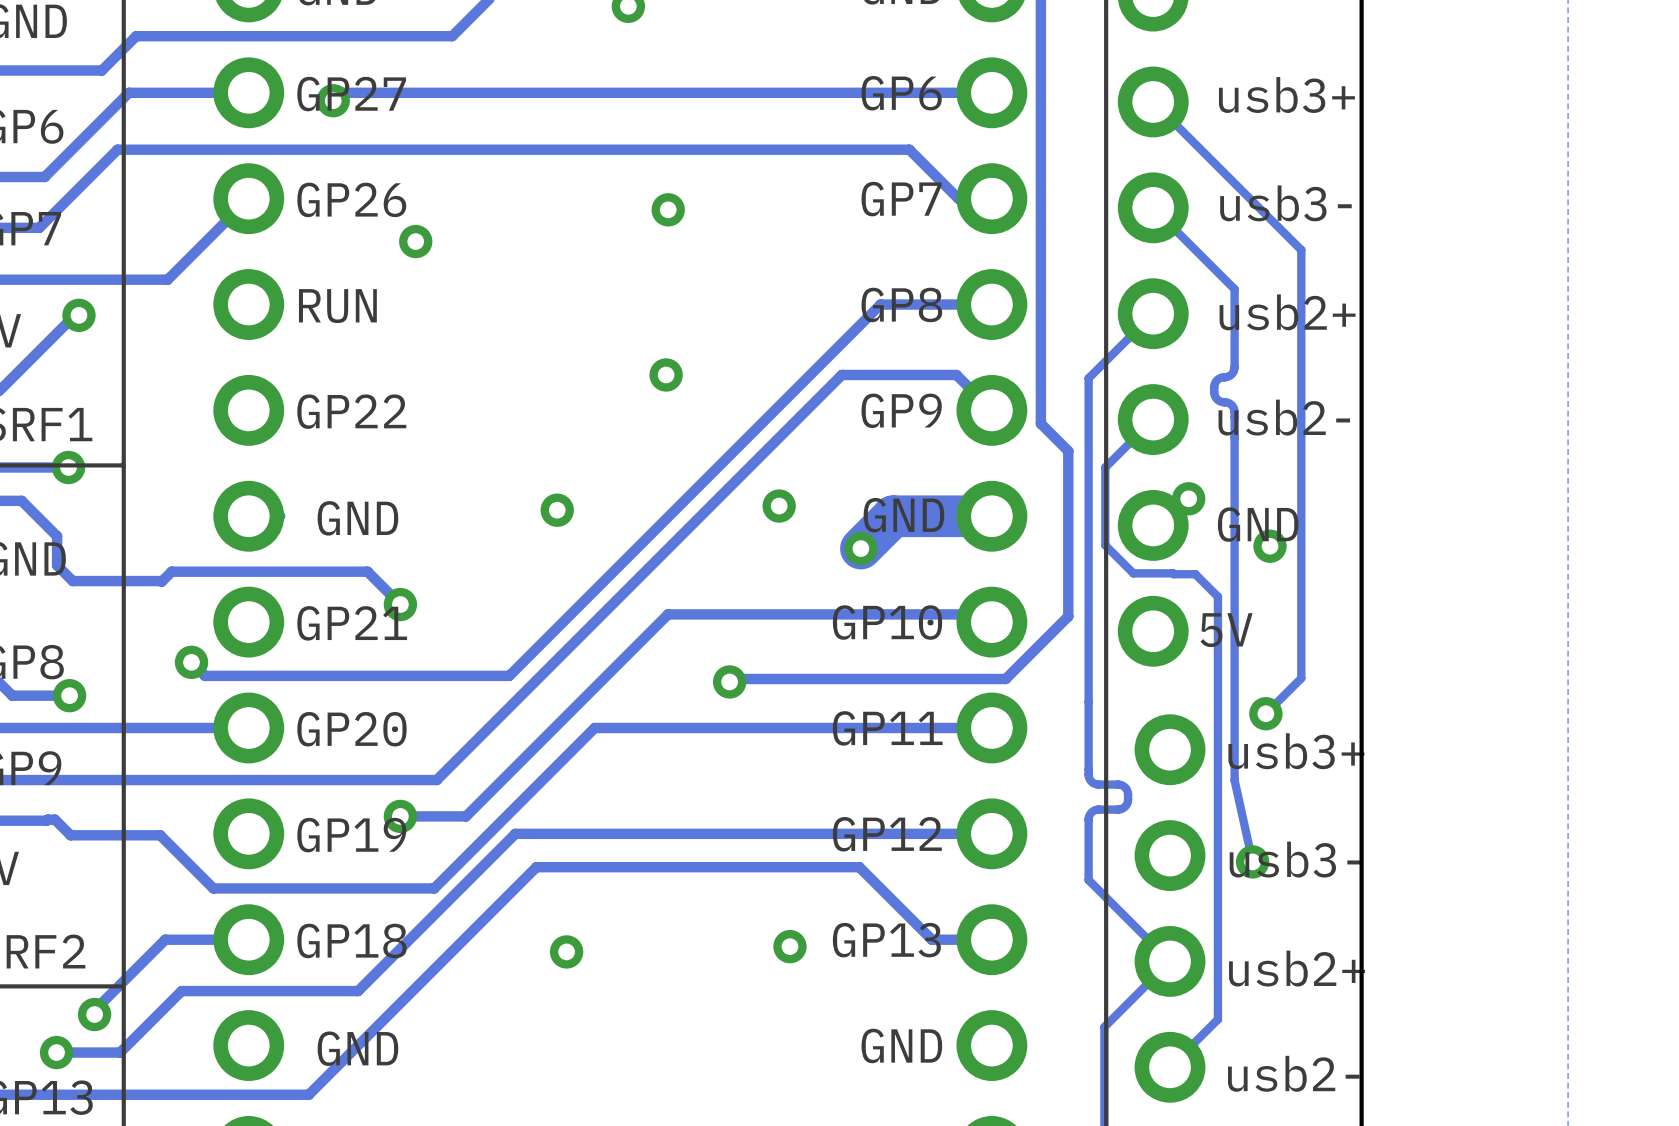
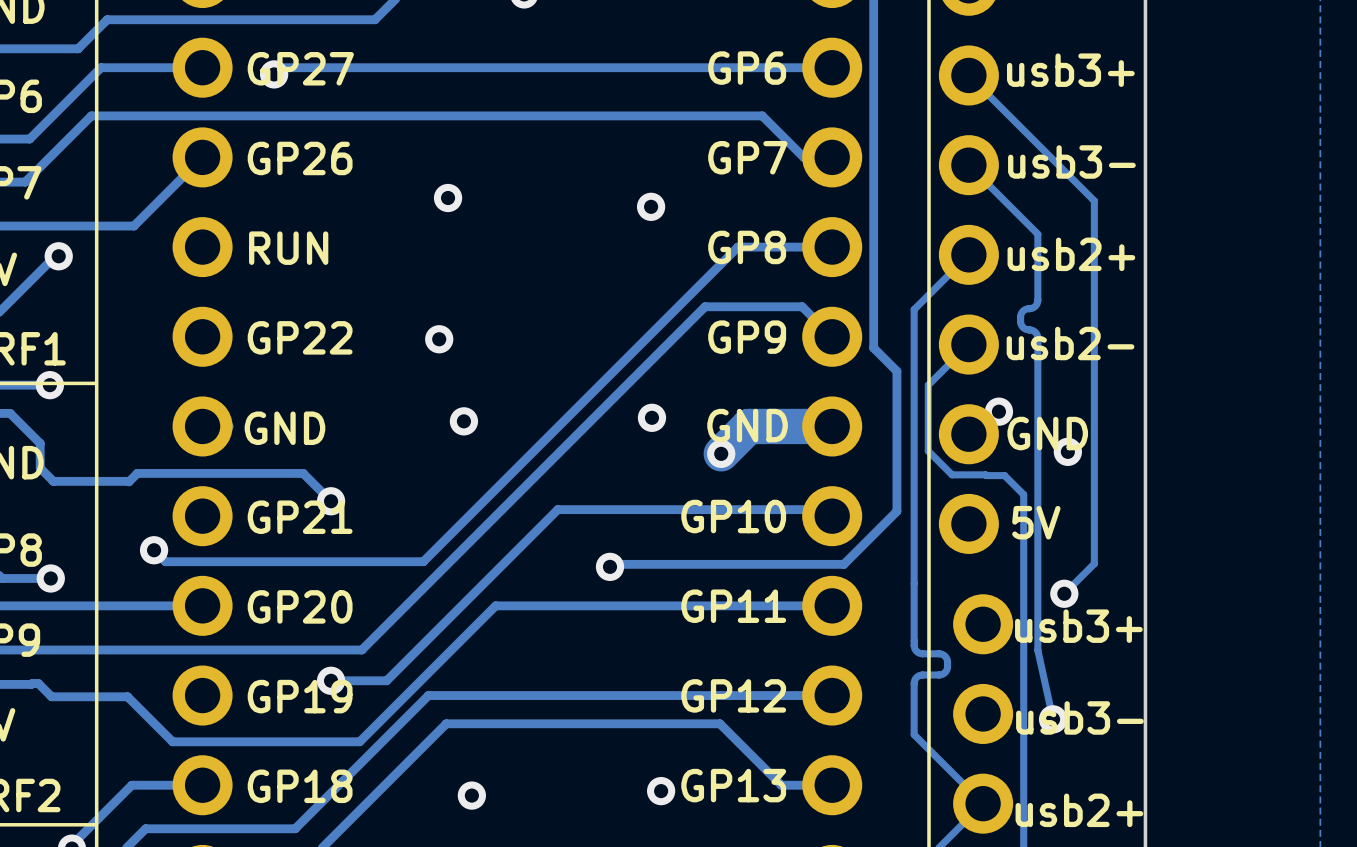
via: (668, 209) -> none
via: (415, 241) -> none
via: none -> (448, 198)
via: none -> (651, 206)
via: (666, 374) -> none
via: none -> (439, 339)

